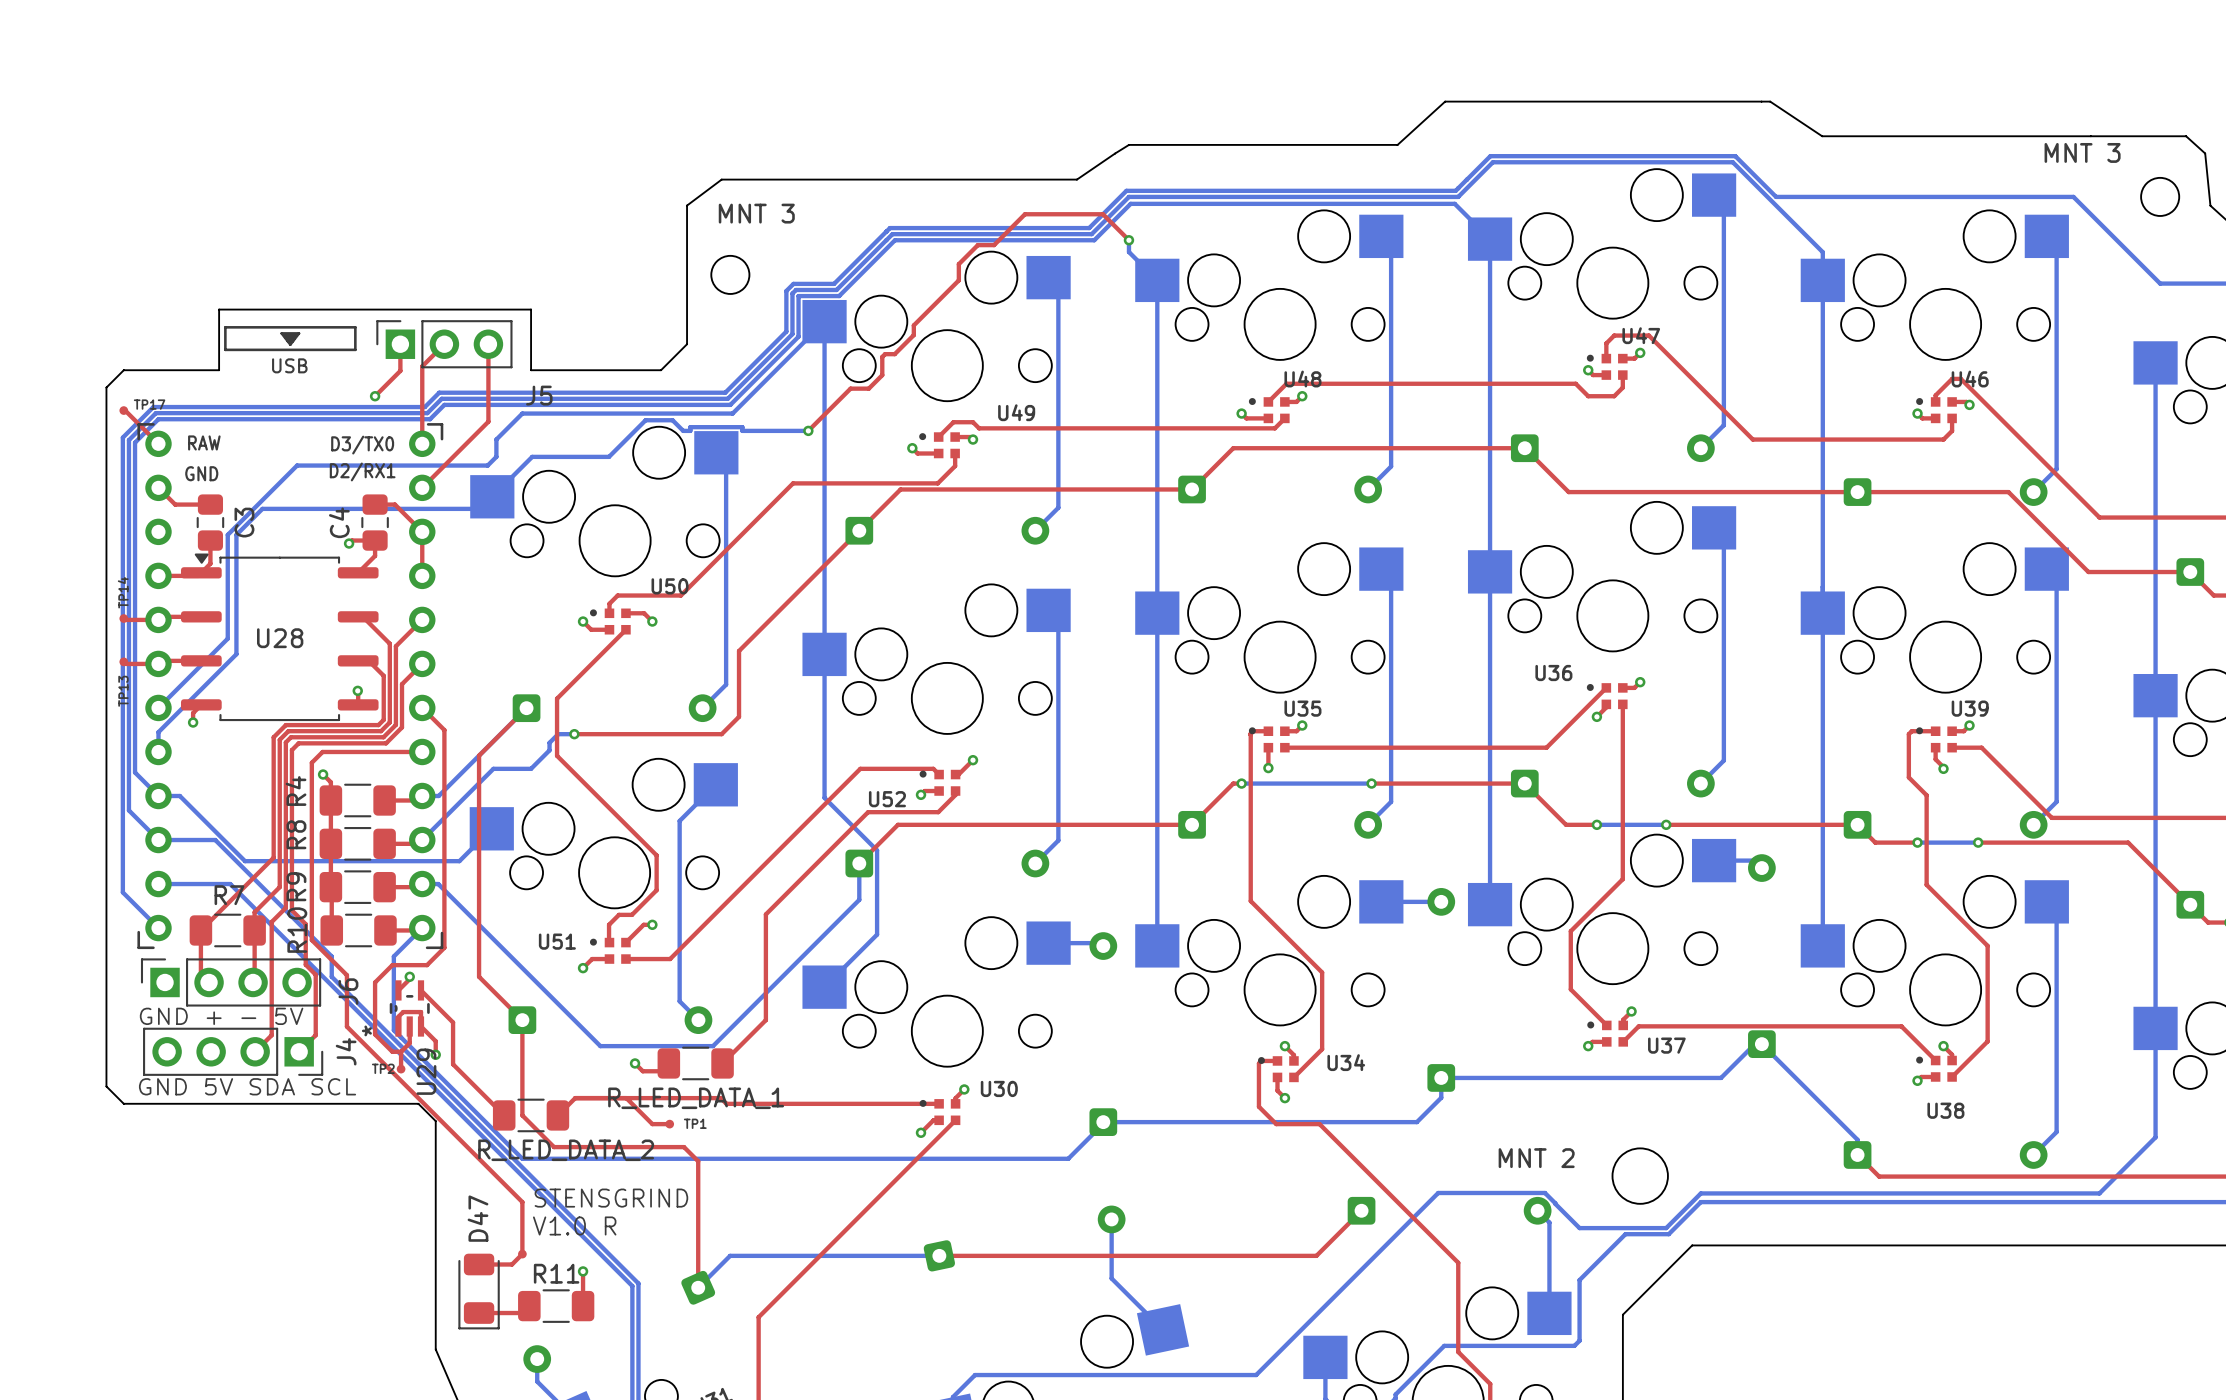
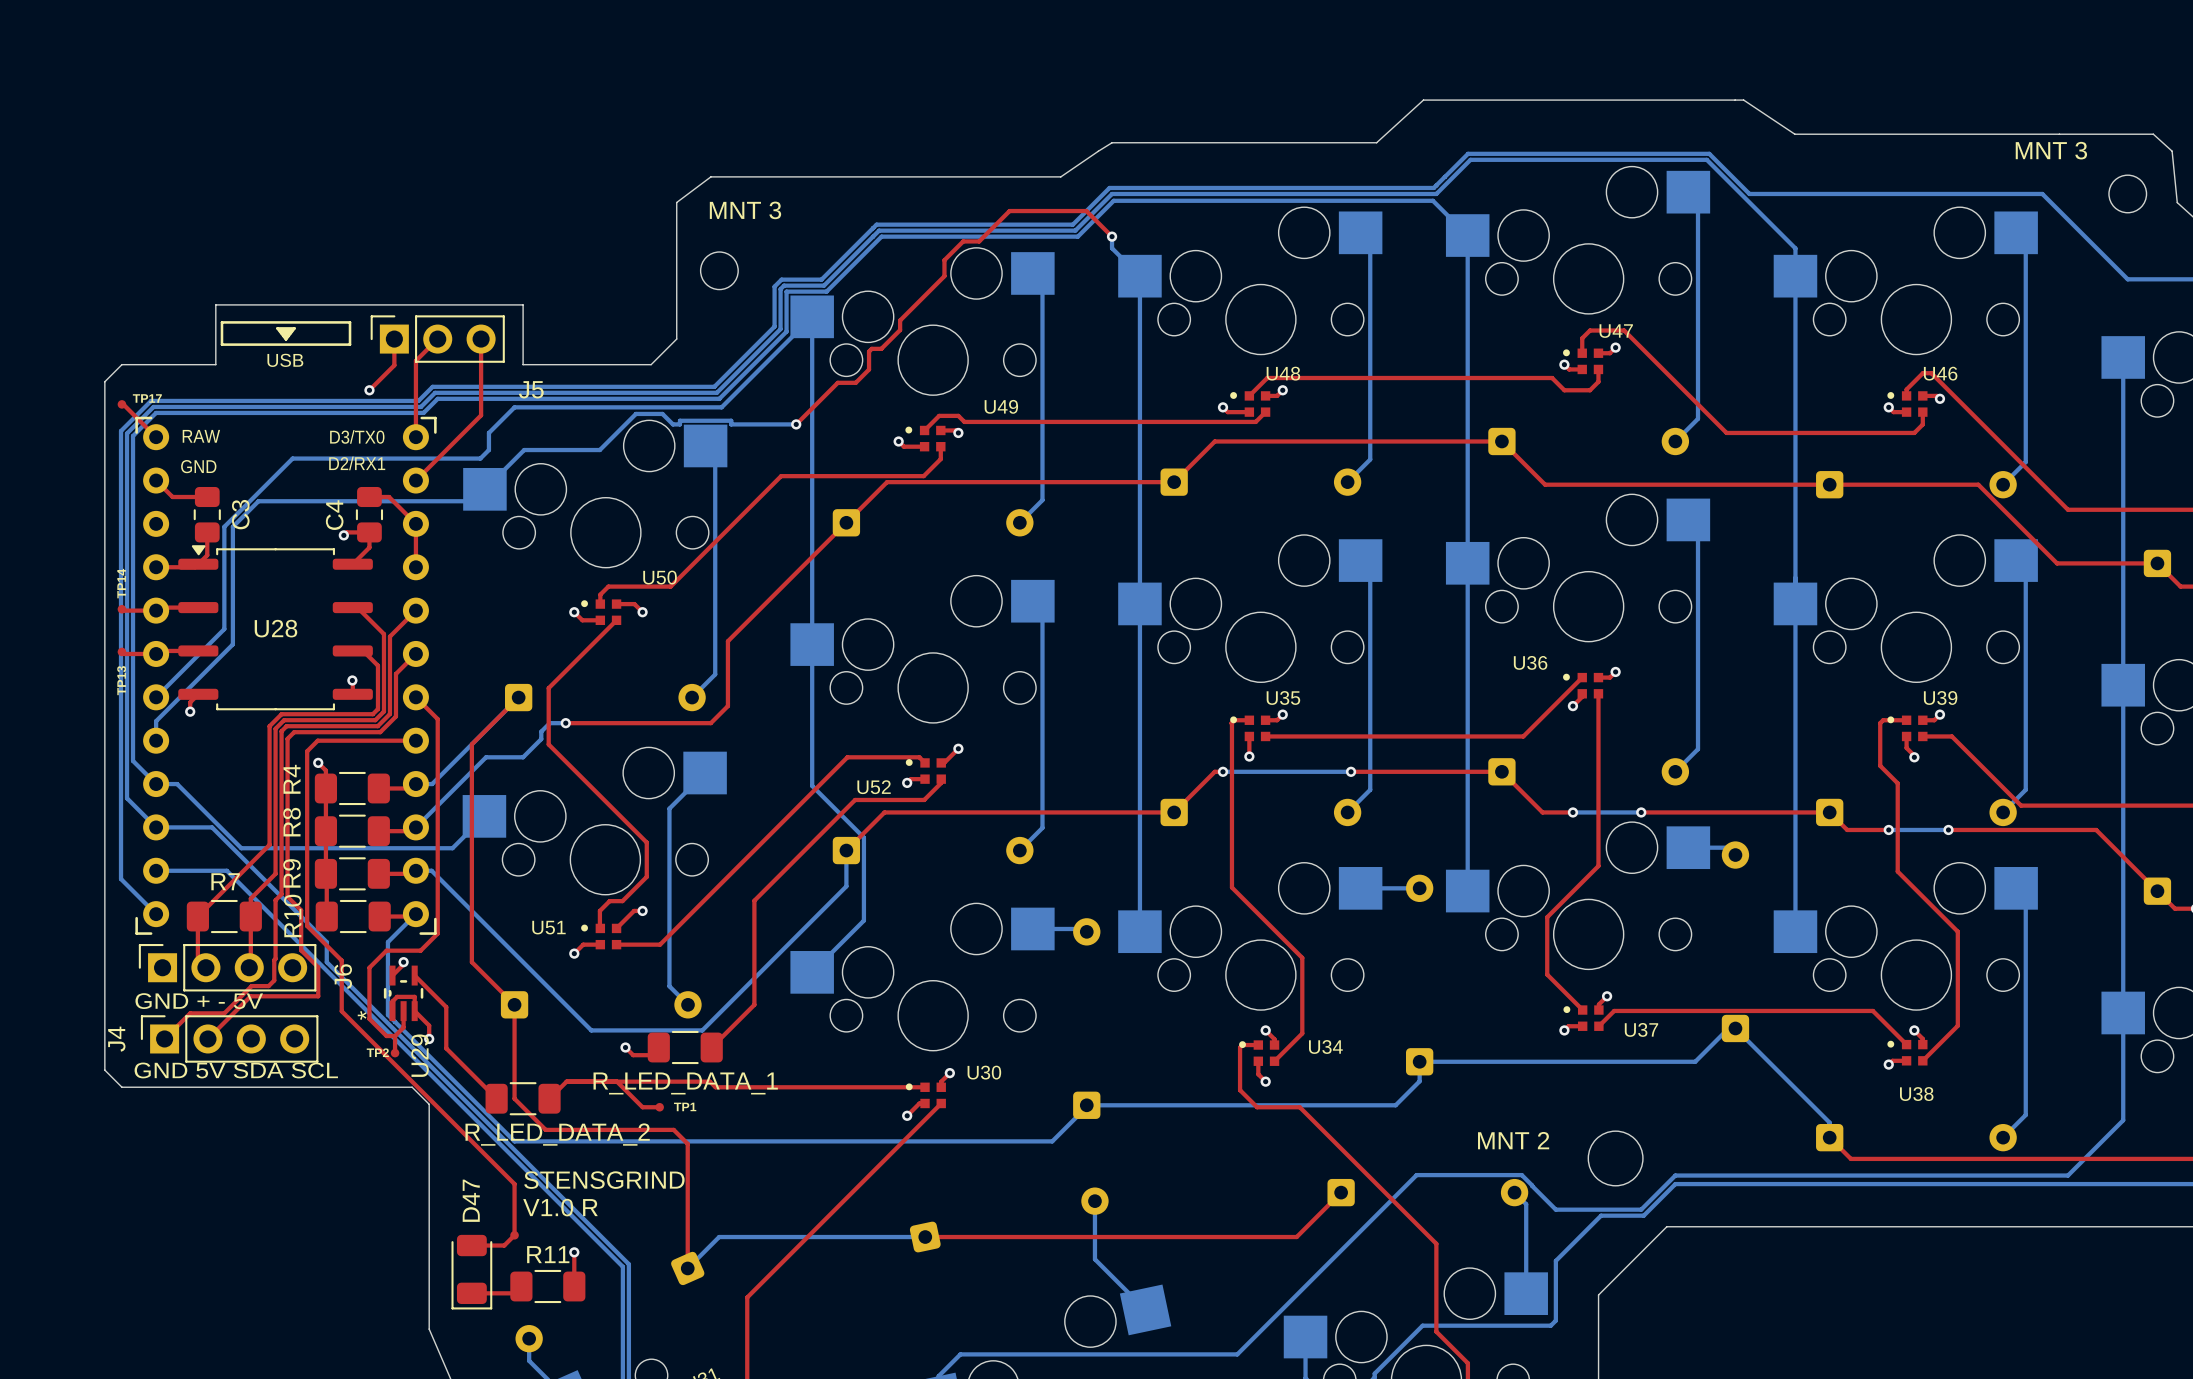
top track: (279, 913) (271, 921) (271, 1035) (255, 1051) -> (275, 900) (274, 980) (268, 986) (251, 986) (224, 1013) (190, 1013) (164, 1038)
top track: (315, 974) (315, 1035) (299, 1051) -> (311, 960) (318, 967) (318, 996) (250, 996) (207, 1038)
J4 rotation: 0° (233, 1051) -> 180° (229, 1038)

